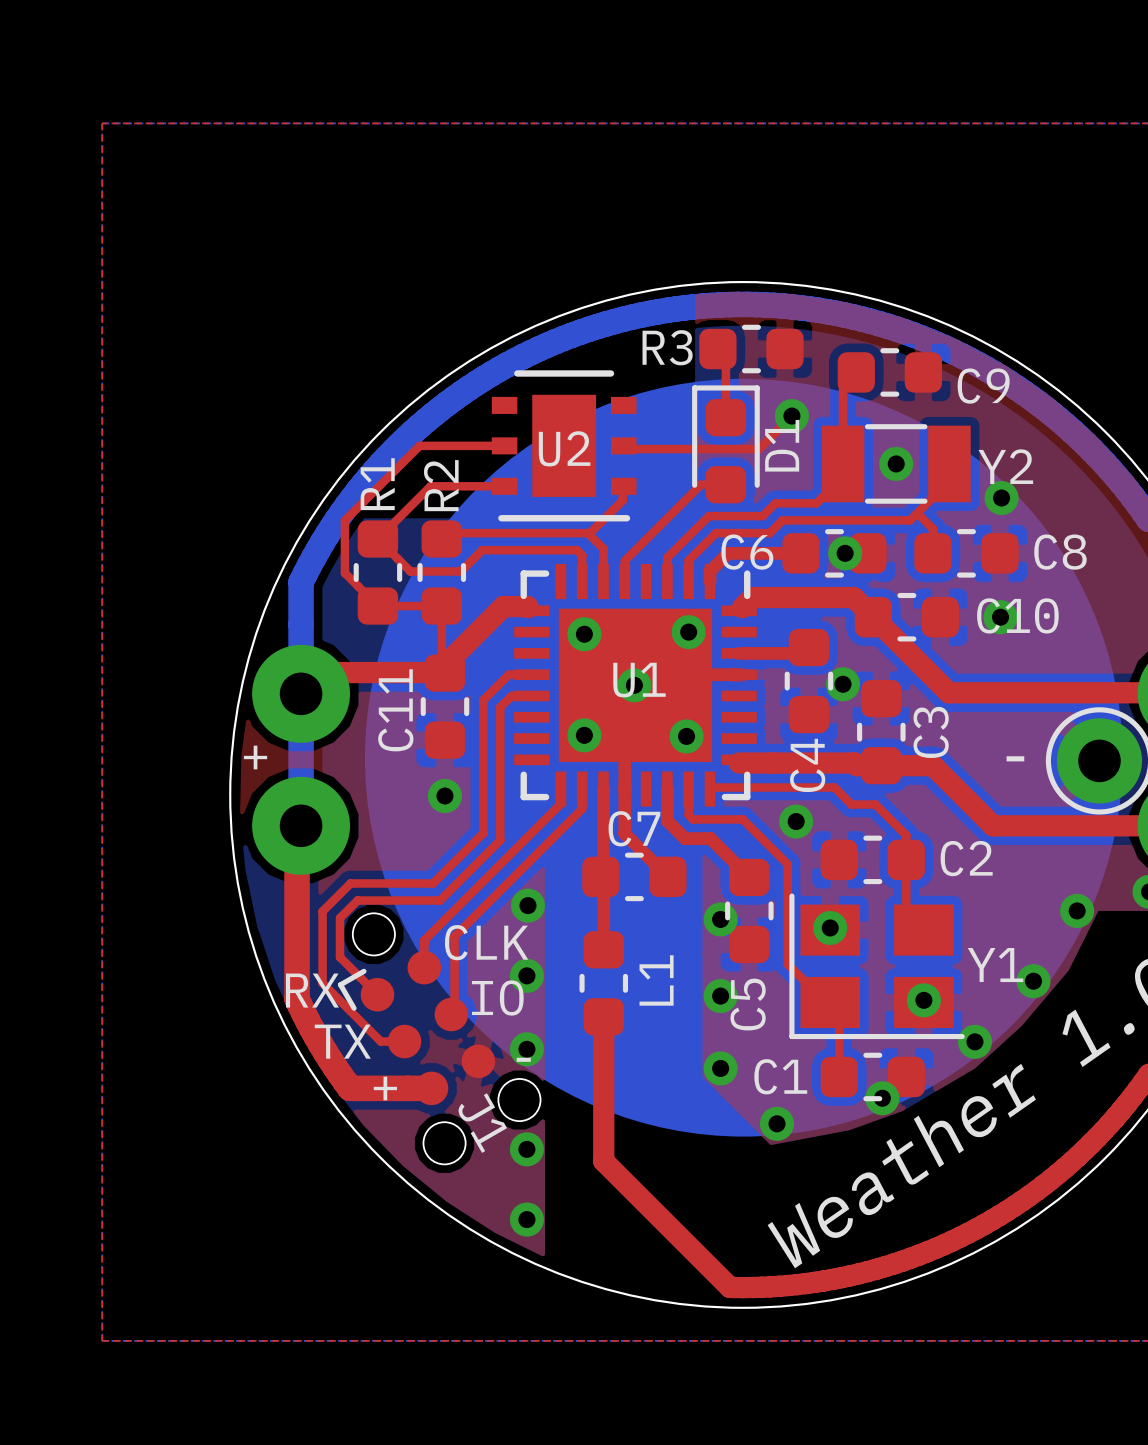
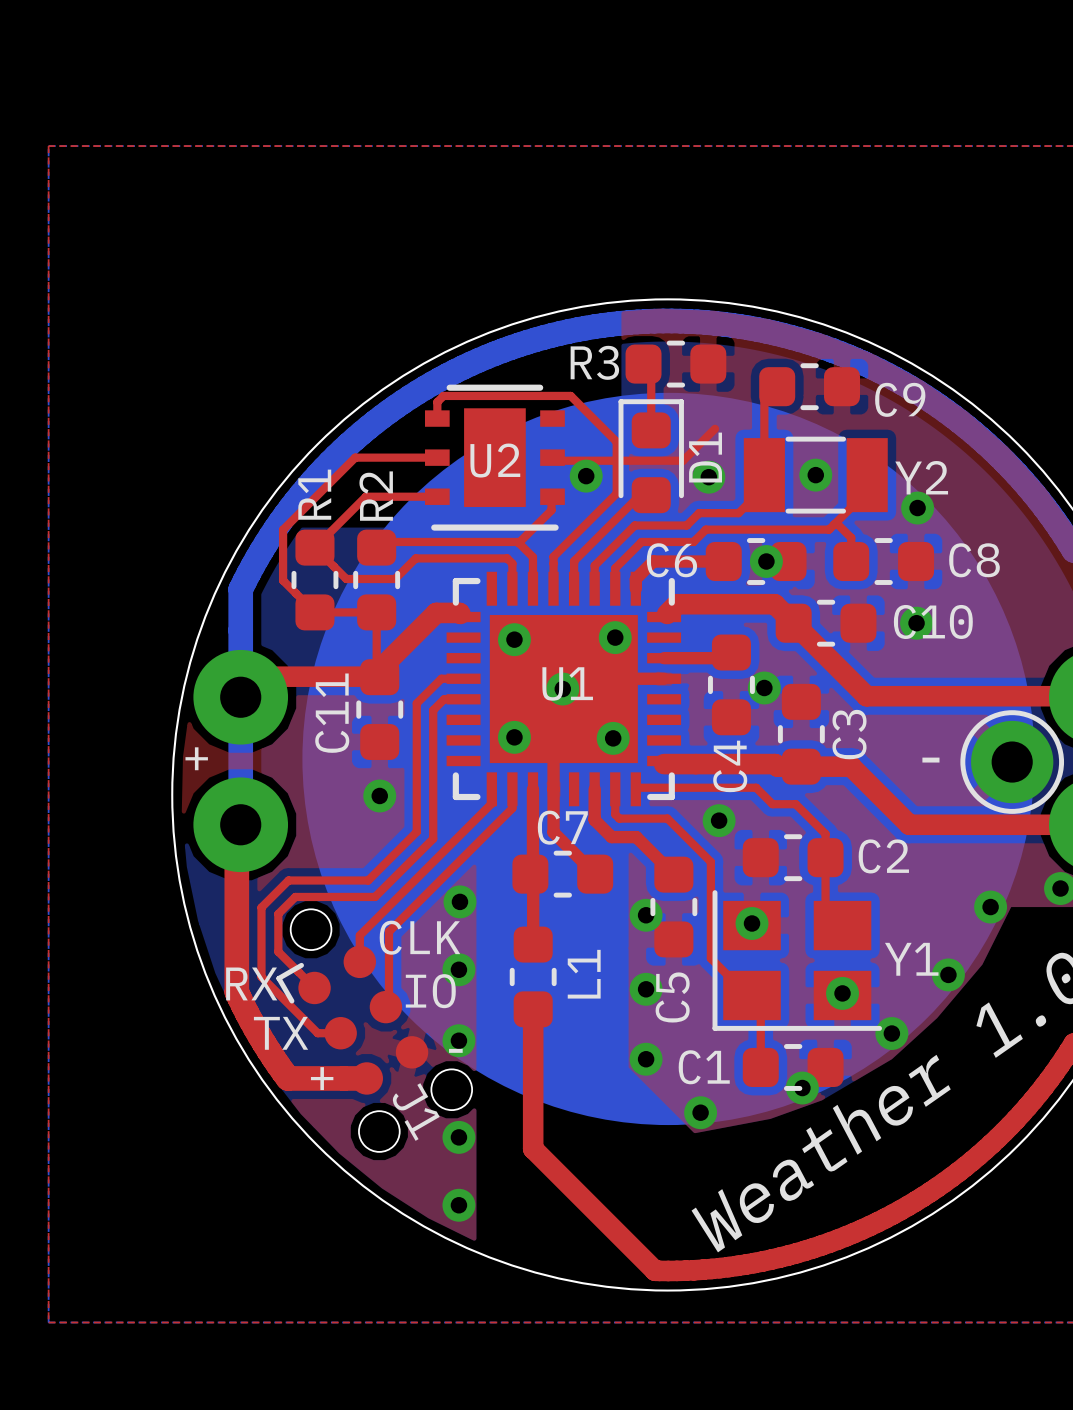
top track: none -> (437, 418) (437, 402) (443, 395) (570, 395) (616, 441) (616, 493) (553, 556) (553, 568)
via position: (791, 416) -> (708, 477)
via: none -> (586, 476)
top track: (714, 484) (700, 484) (624, 560) -> (640, 495) (574, 561) (574, 588)

